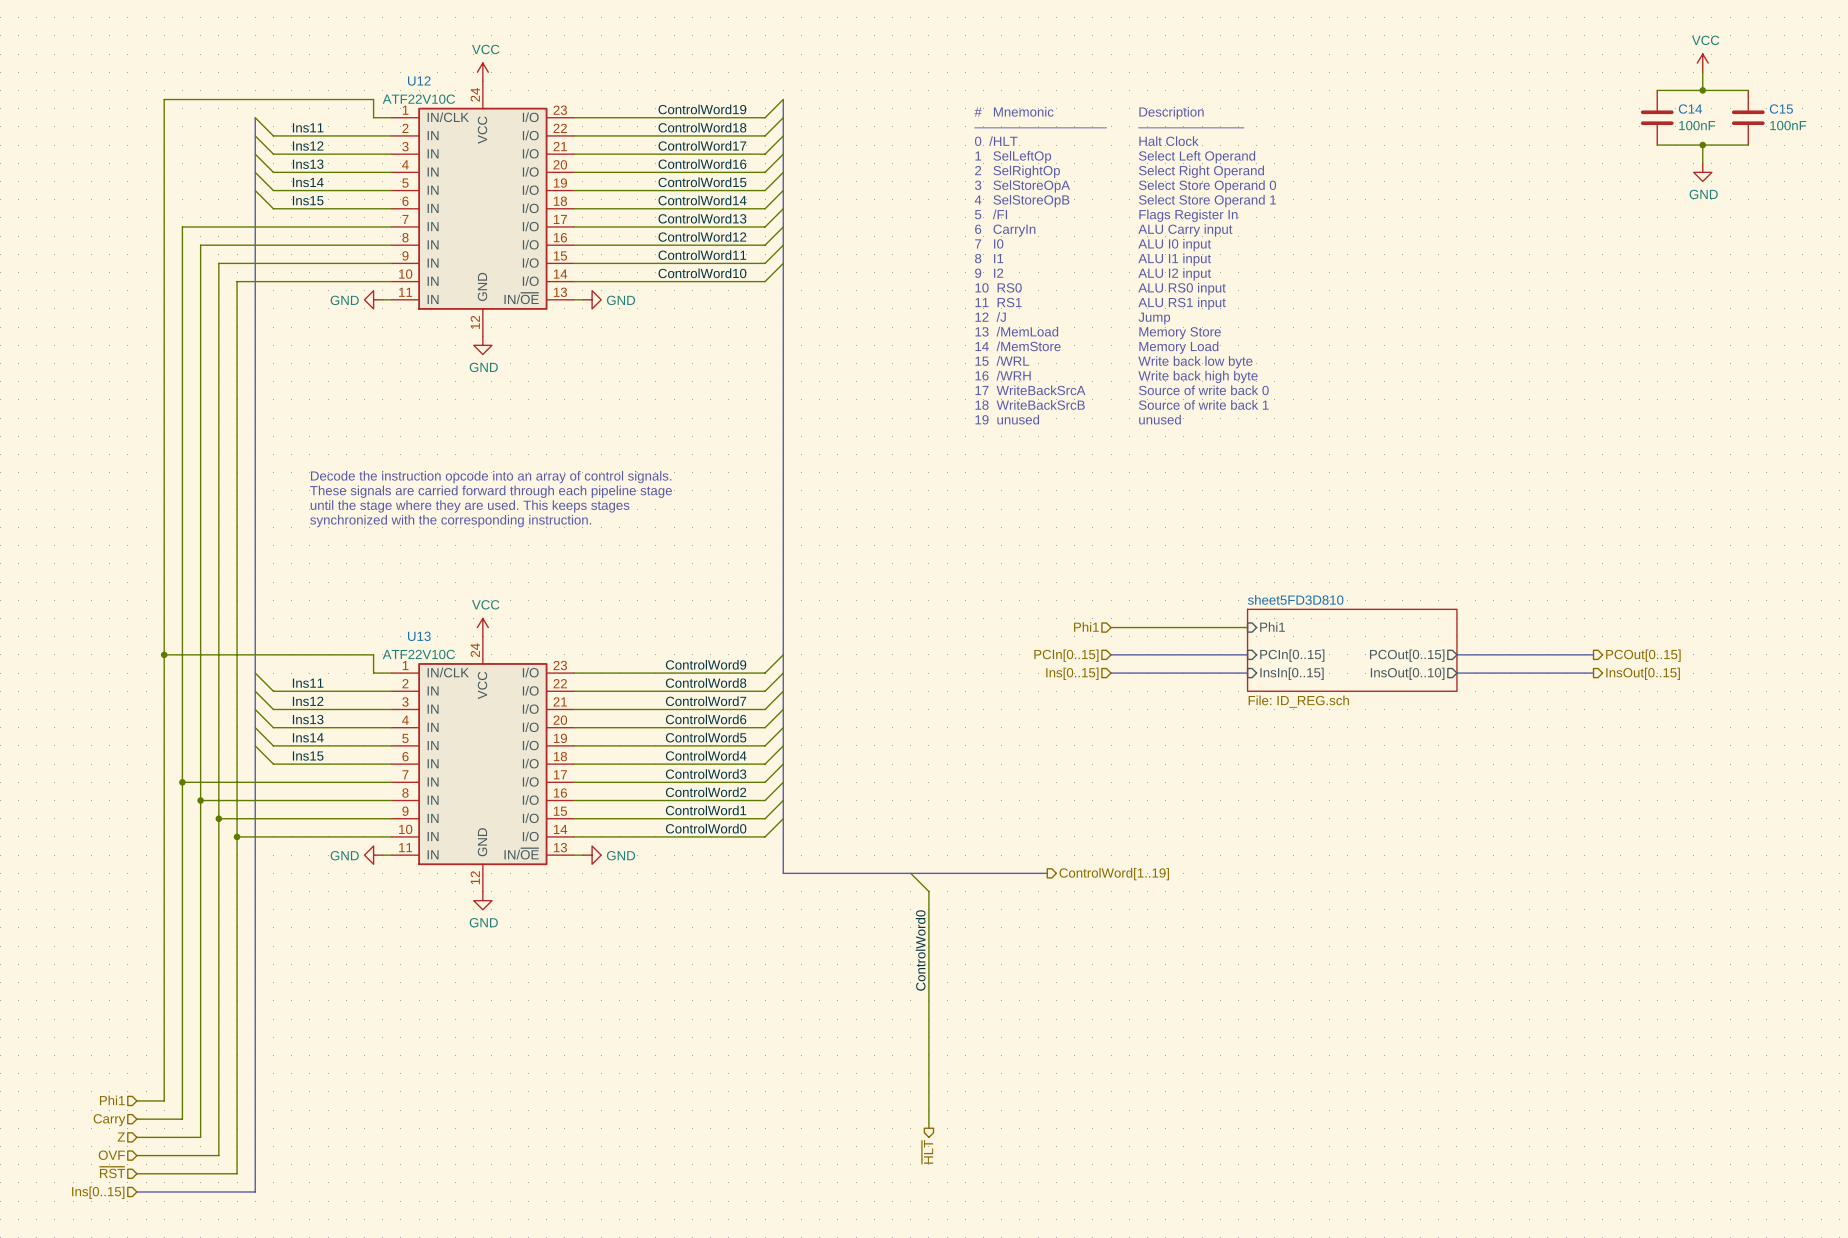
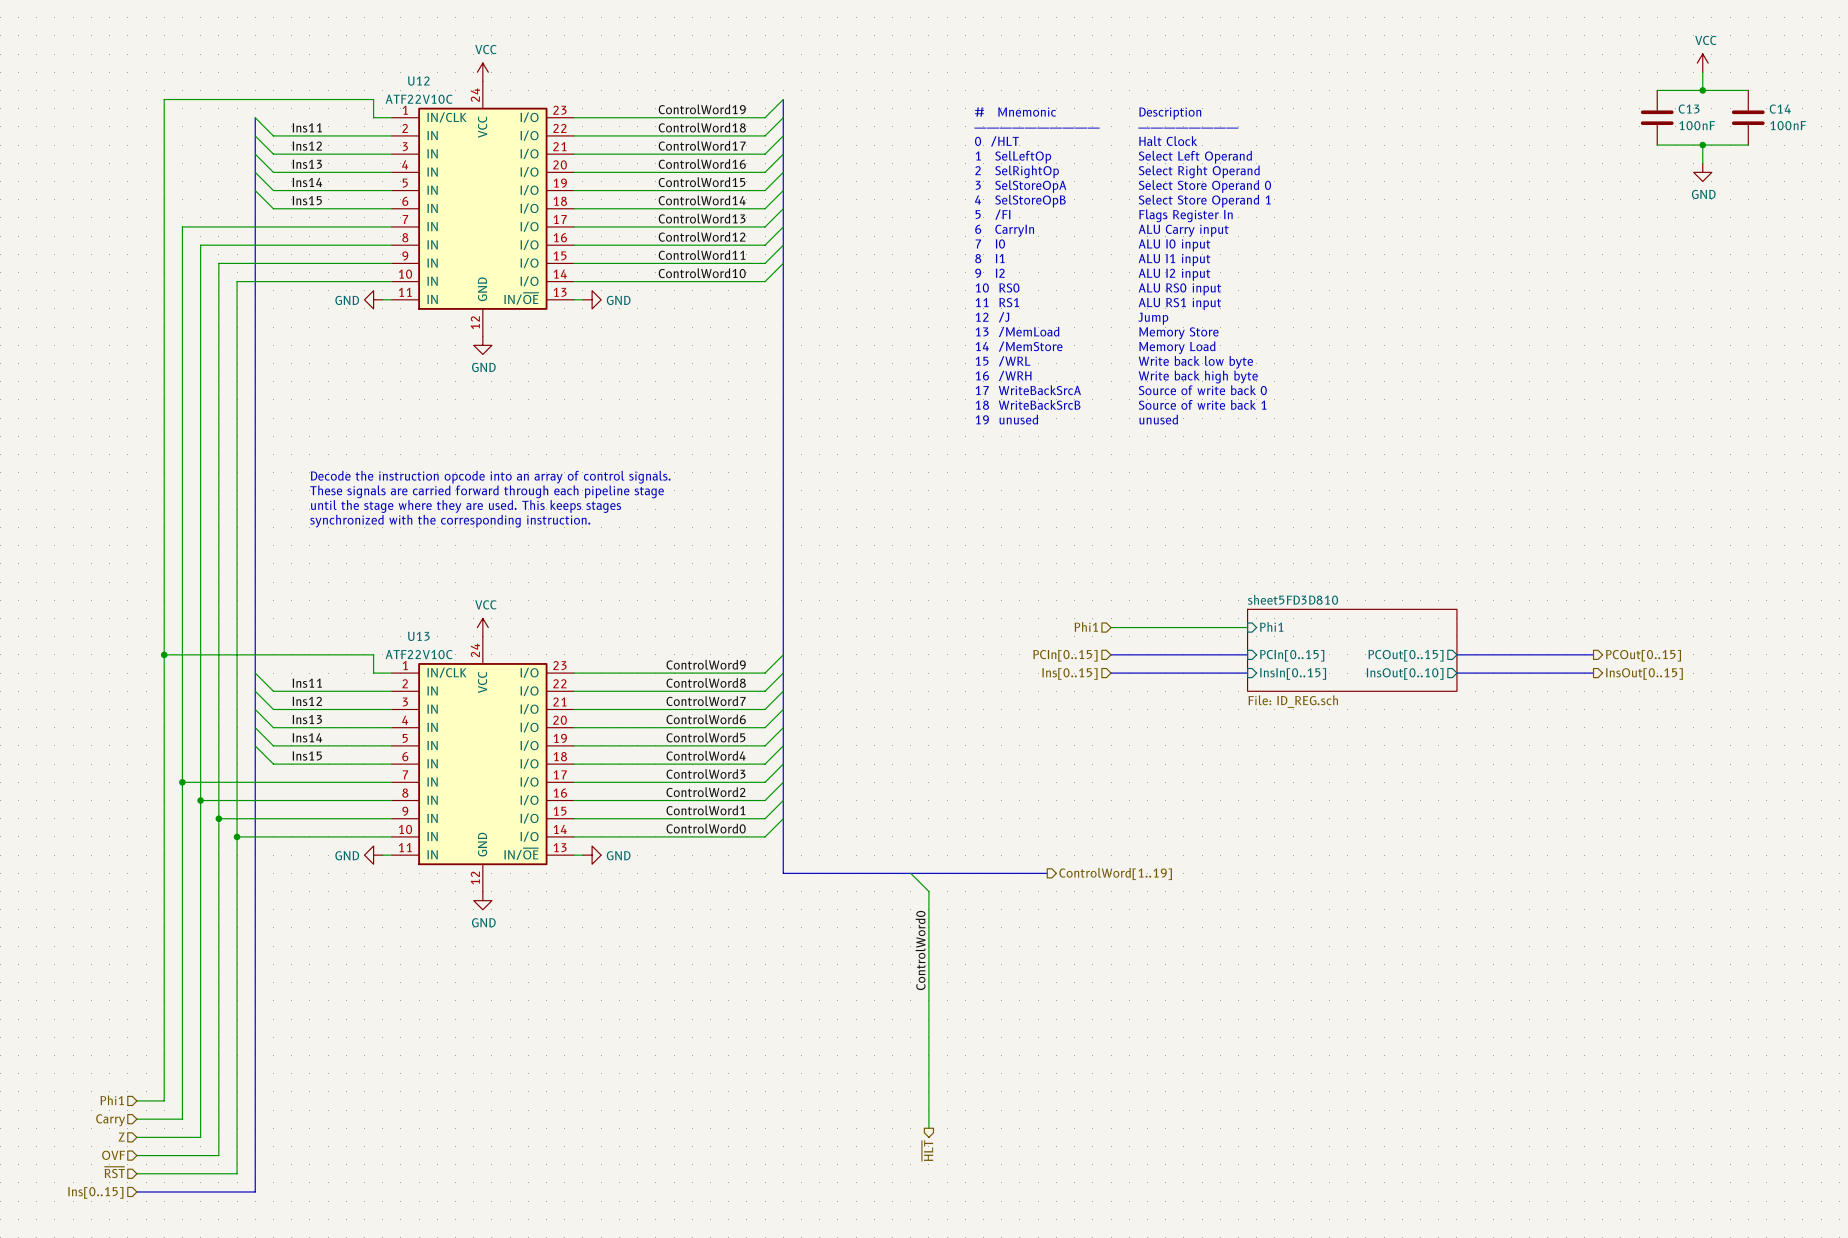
C14 name: C14 (1690, 109) -> C13 (1689, 109)
C15 name: C15 (1781, 109) -> C14 (1780, 109)

